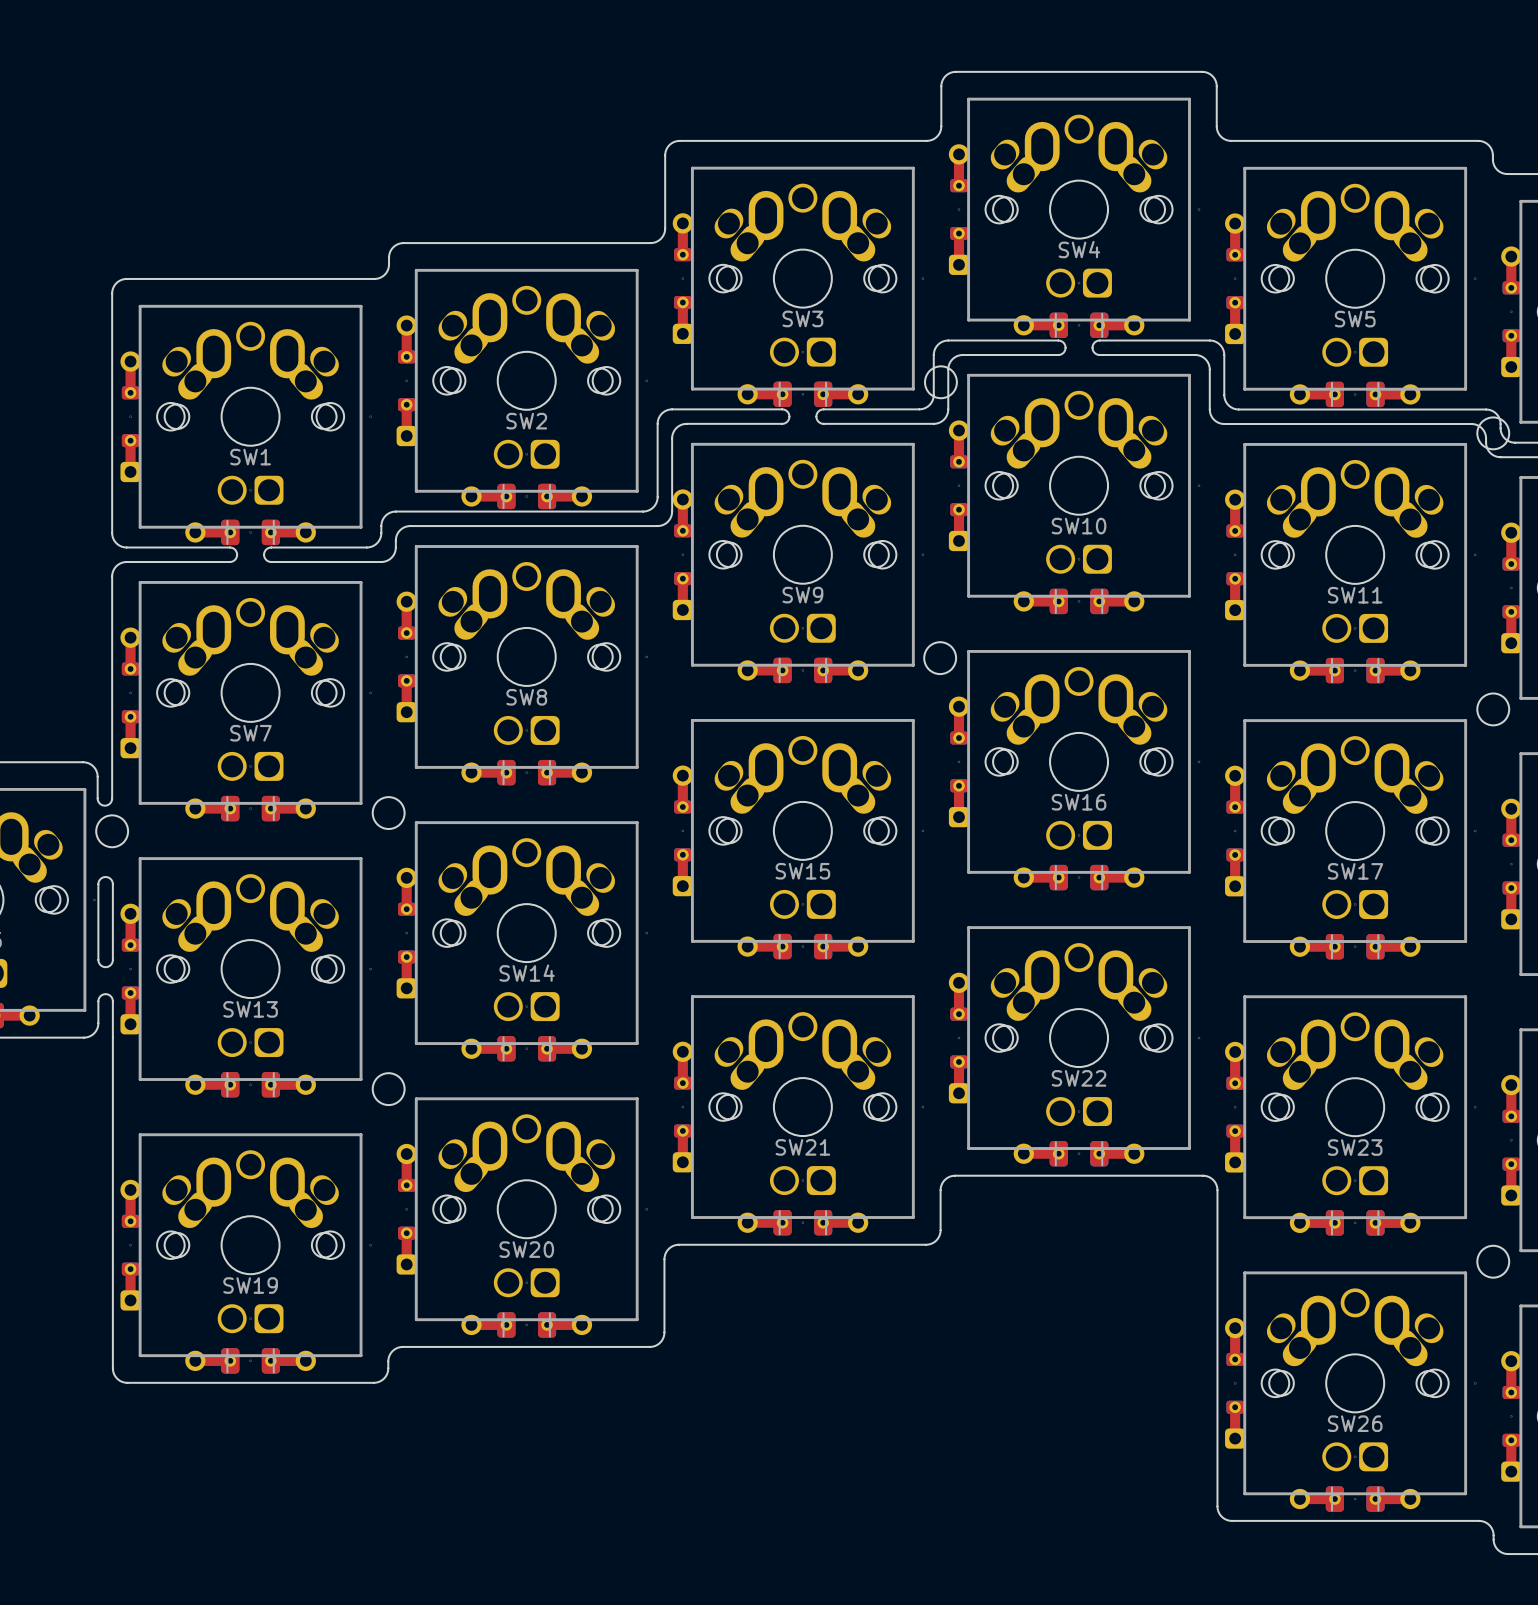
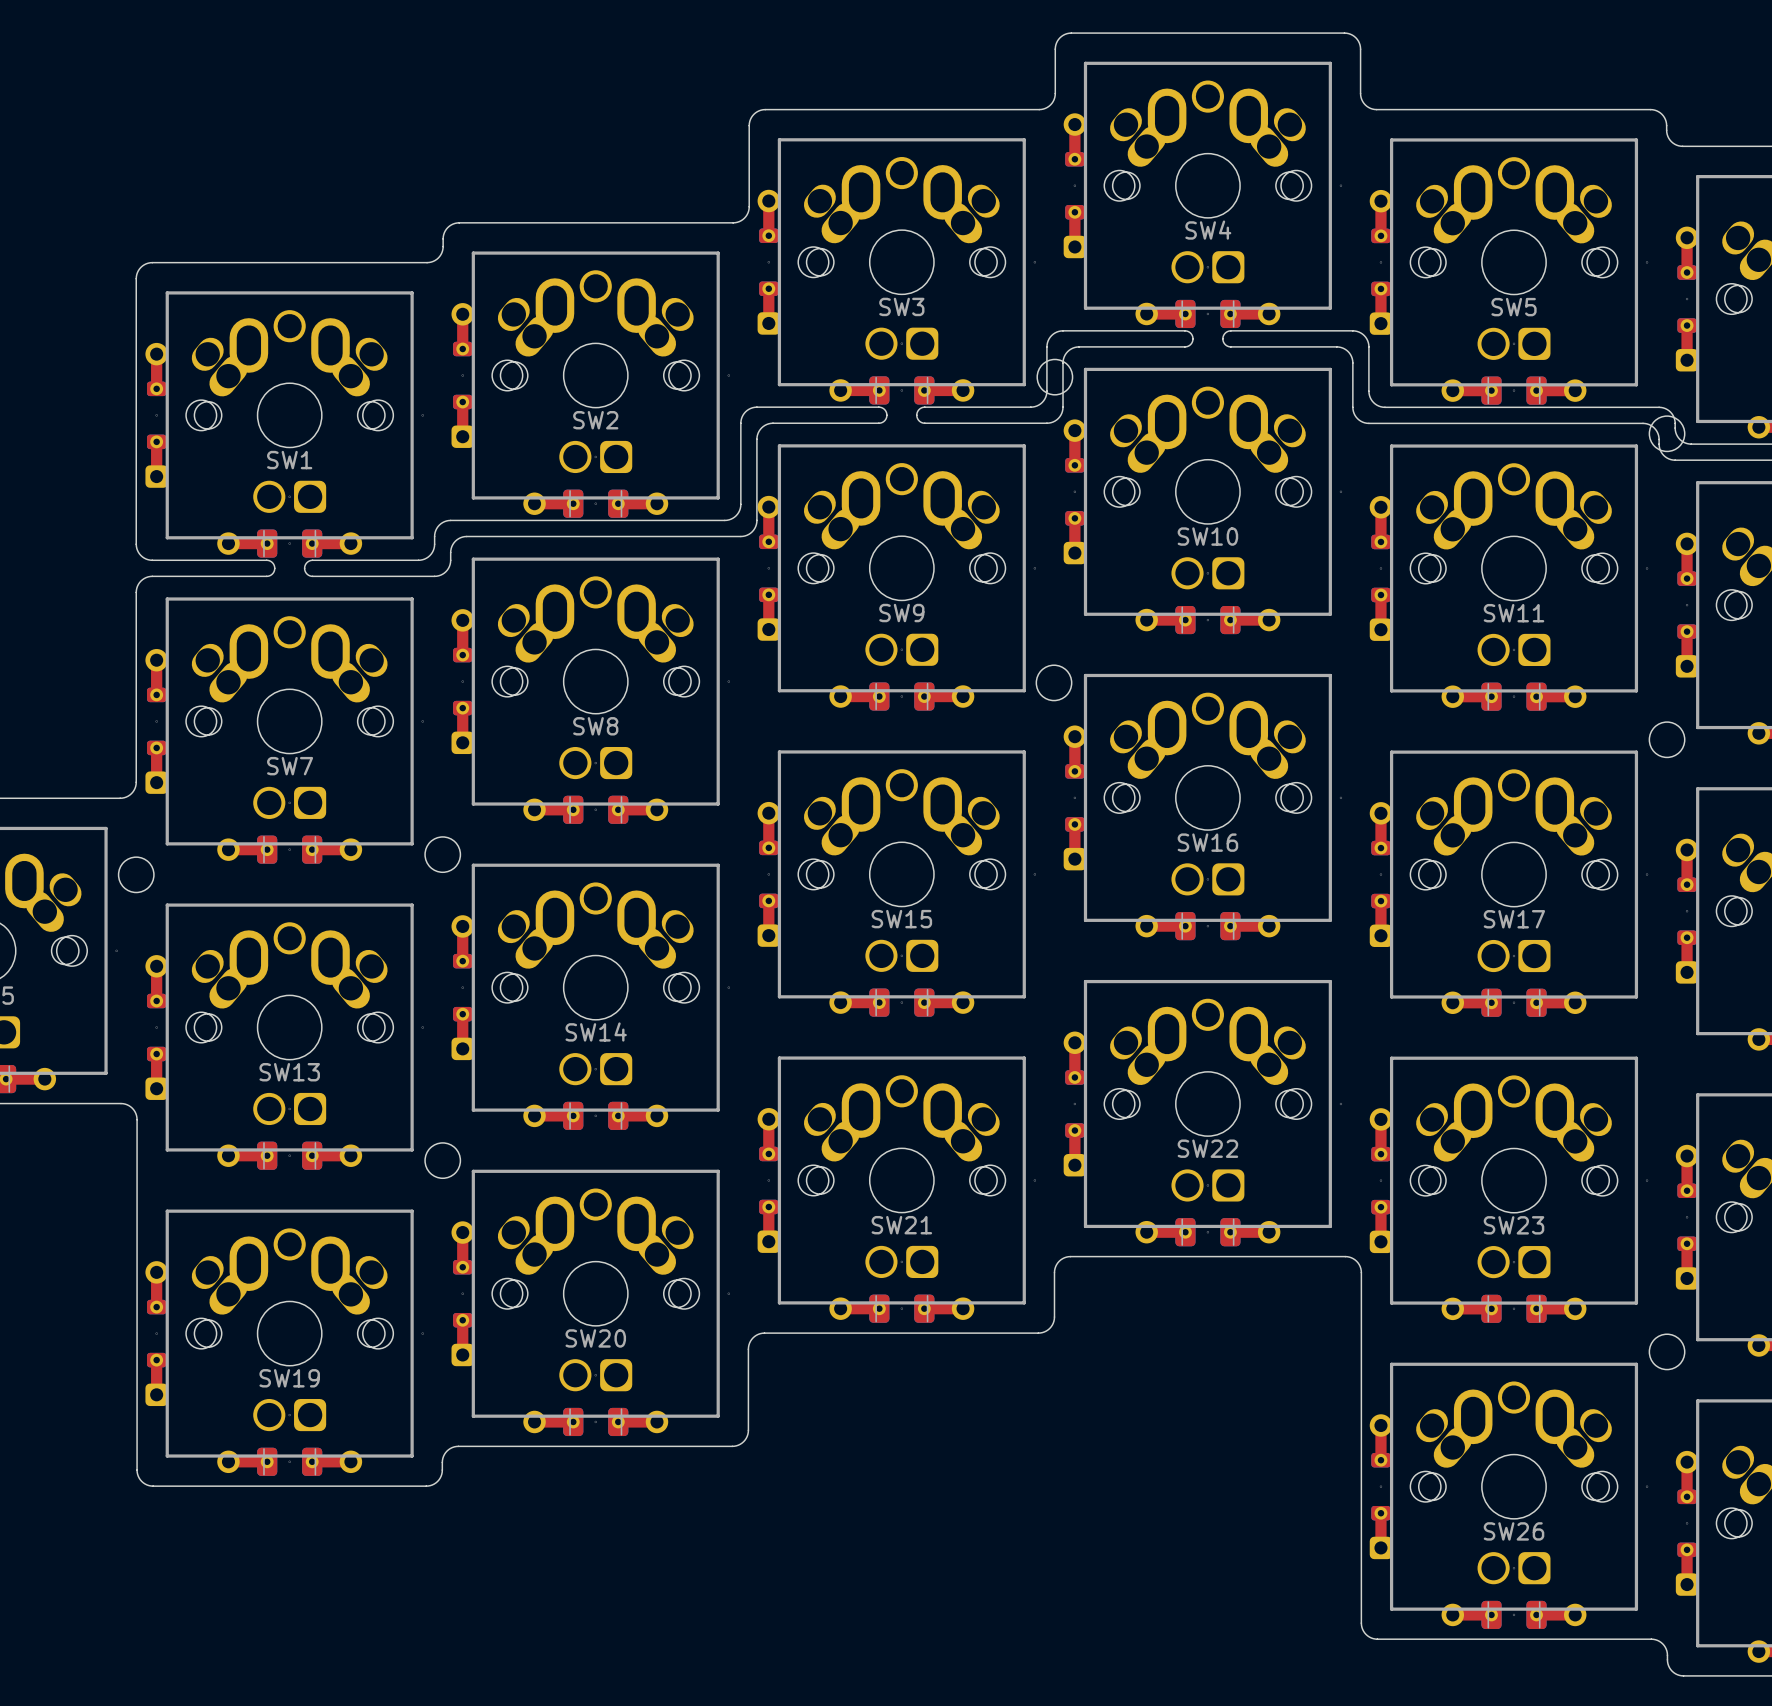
board edge: (112, 747) (112, 798) (108, 804) (103, 805) (98, 802) (96, 771) (91, 765) (83, 762) -> (136, 782) (134, 790) (128, 796) (104, 798)
board edge: (98, 884) (98, 960) (101, 965) (106, 967) (112, 960) (112, 883) (110, 878) (104, 877) (99, 879) (98, 884) -> none
board edge: (83, 1037) (92, 1034) (97, 1028) (99, 997) (103, 994) (109, 995) (112, 1001) (112, 1052) -> (104, 1103) (129, 1105) (134, 1111) (137, 1119)

